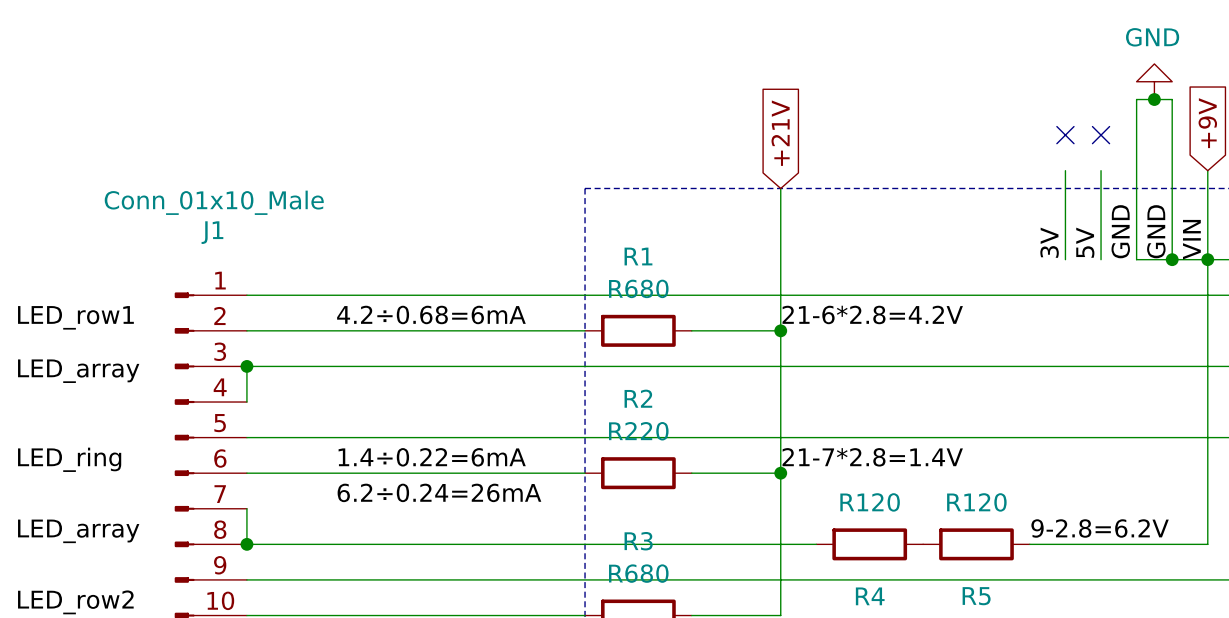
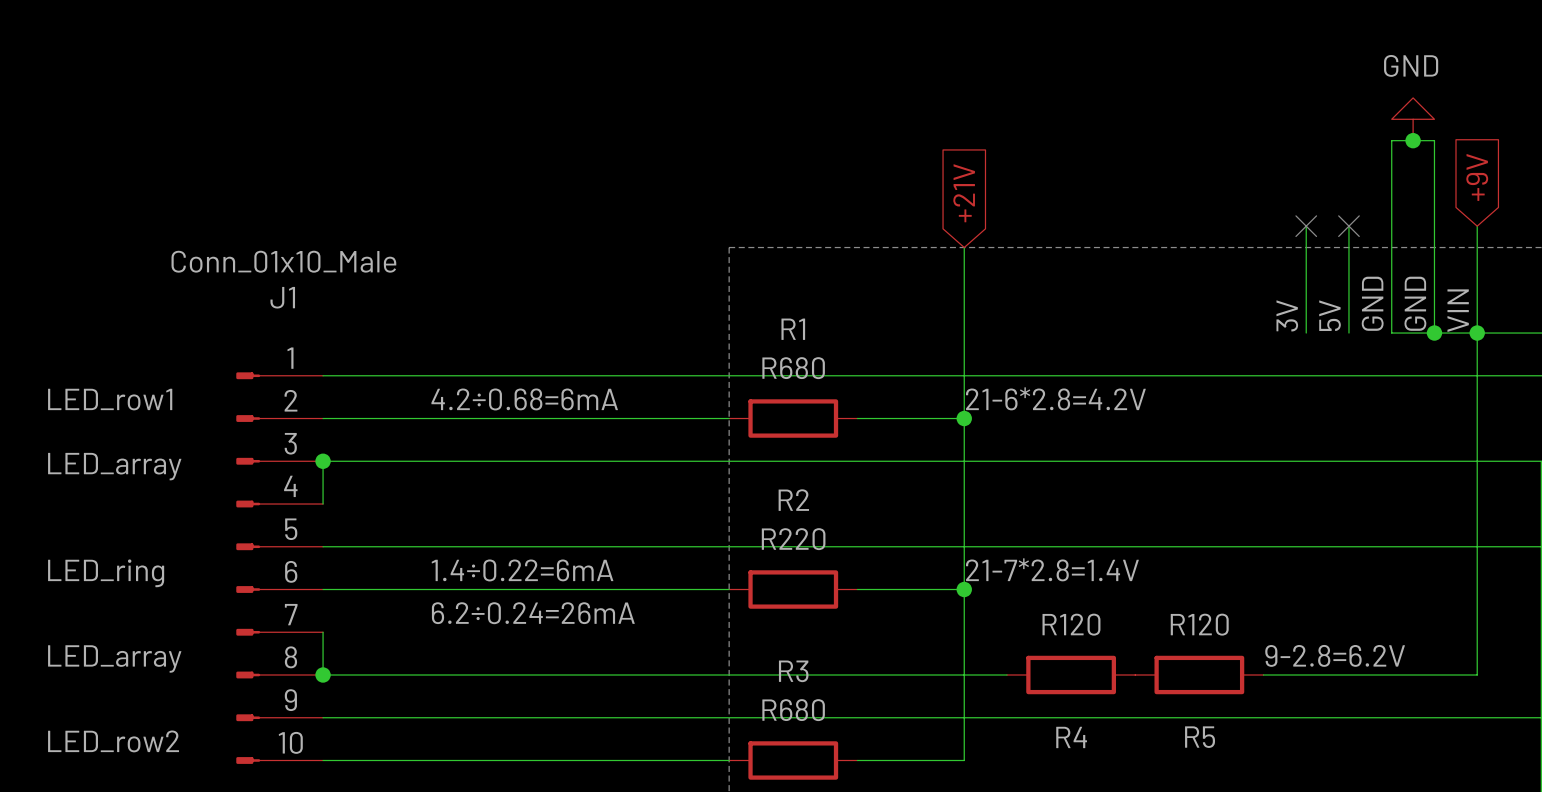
no-connect mark: (1065, 135) -> none
no-connect mark: (1101, 135) -> none
no-connect mark: none -> (1306, 226)
no-connect mark: none -> (1348, 226)

